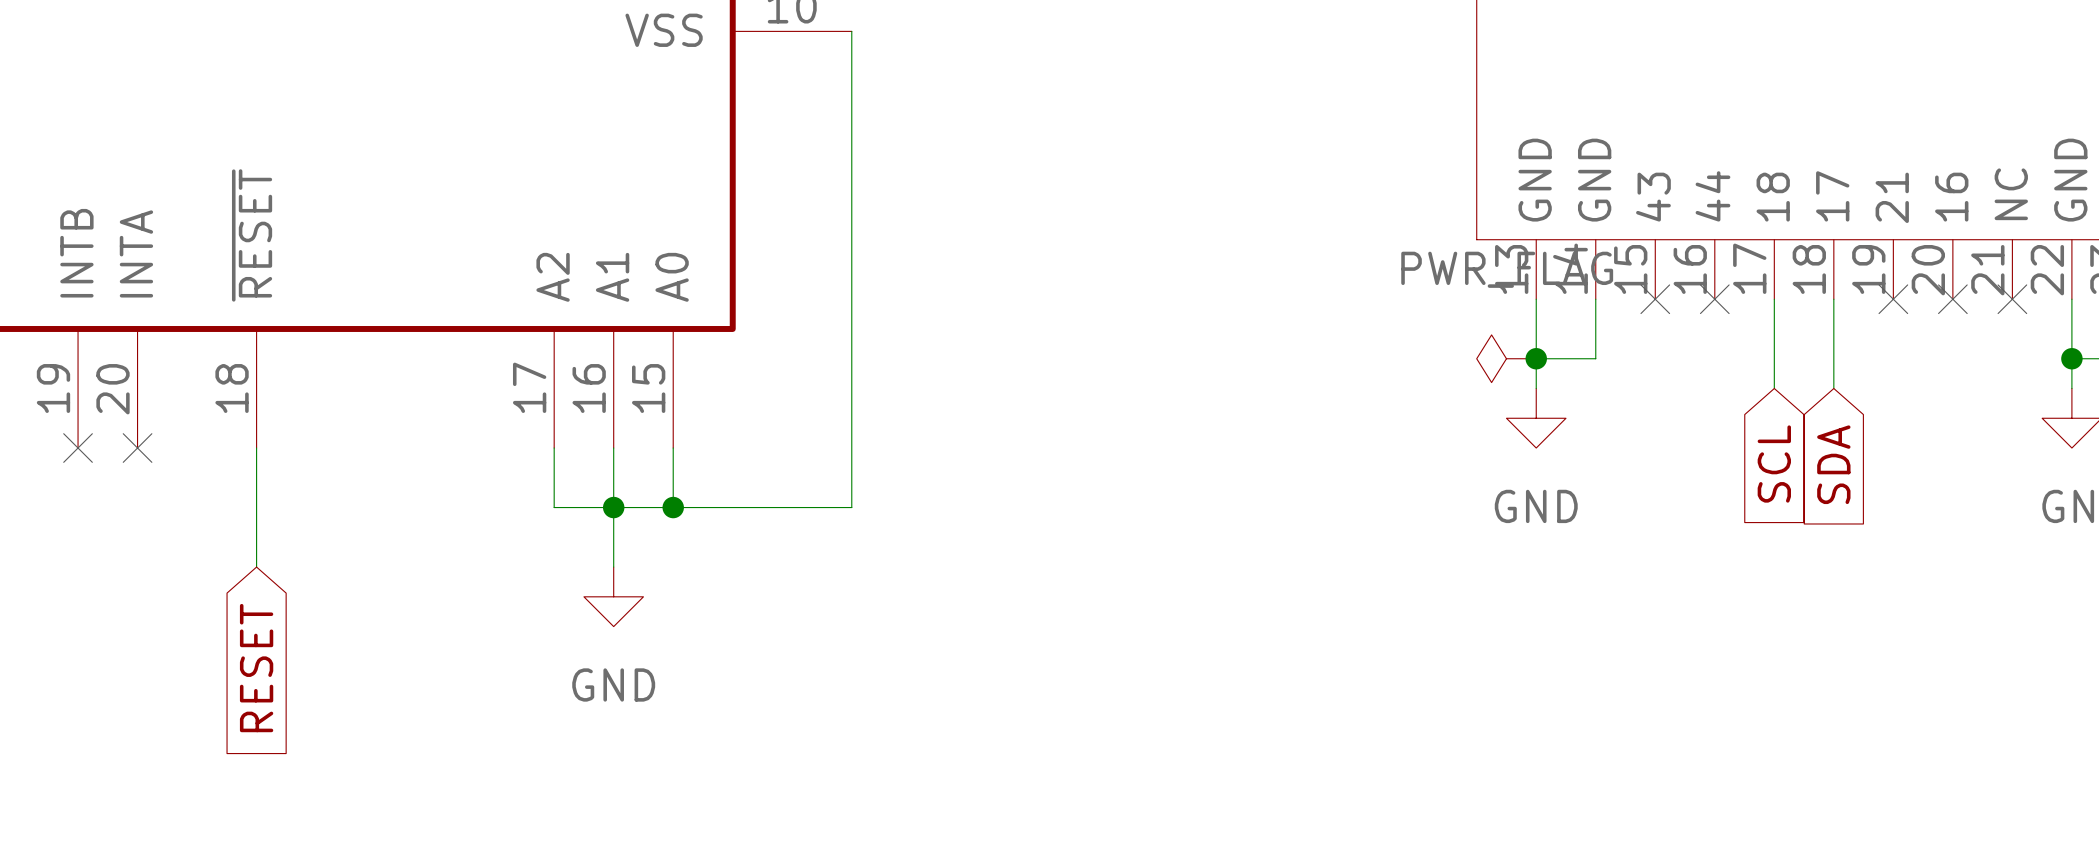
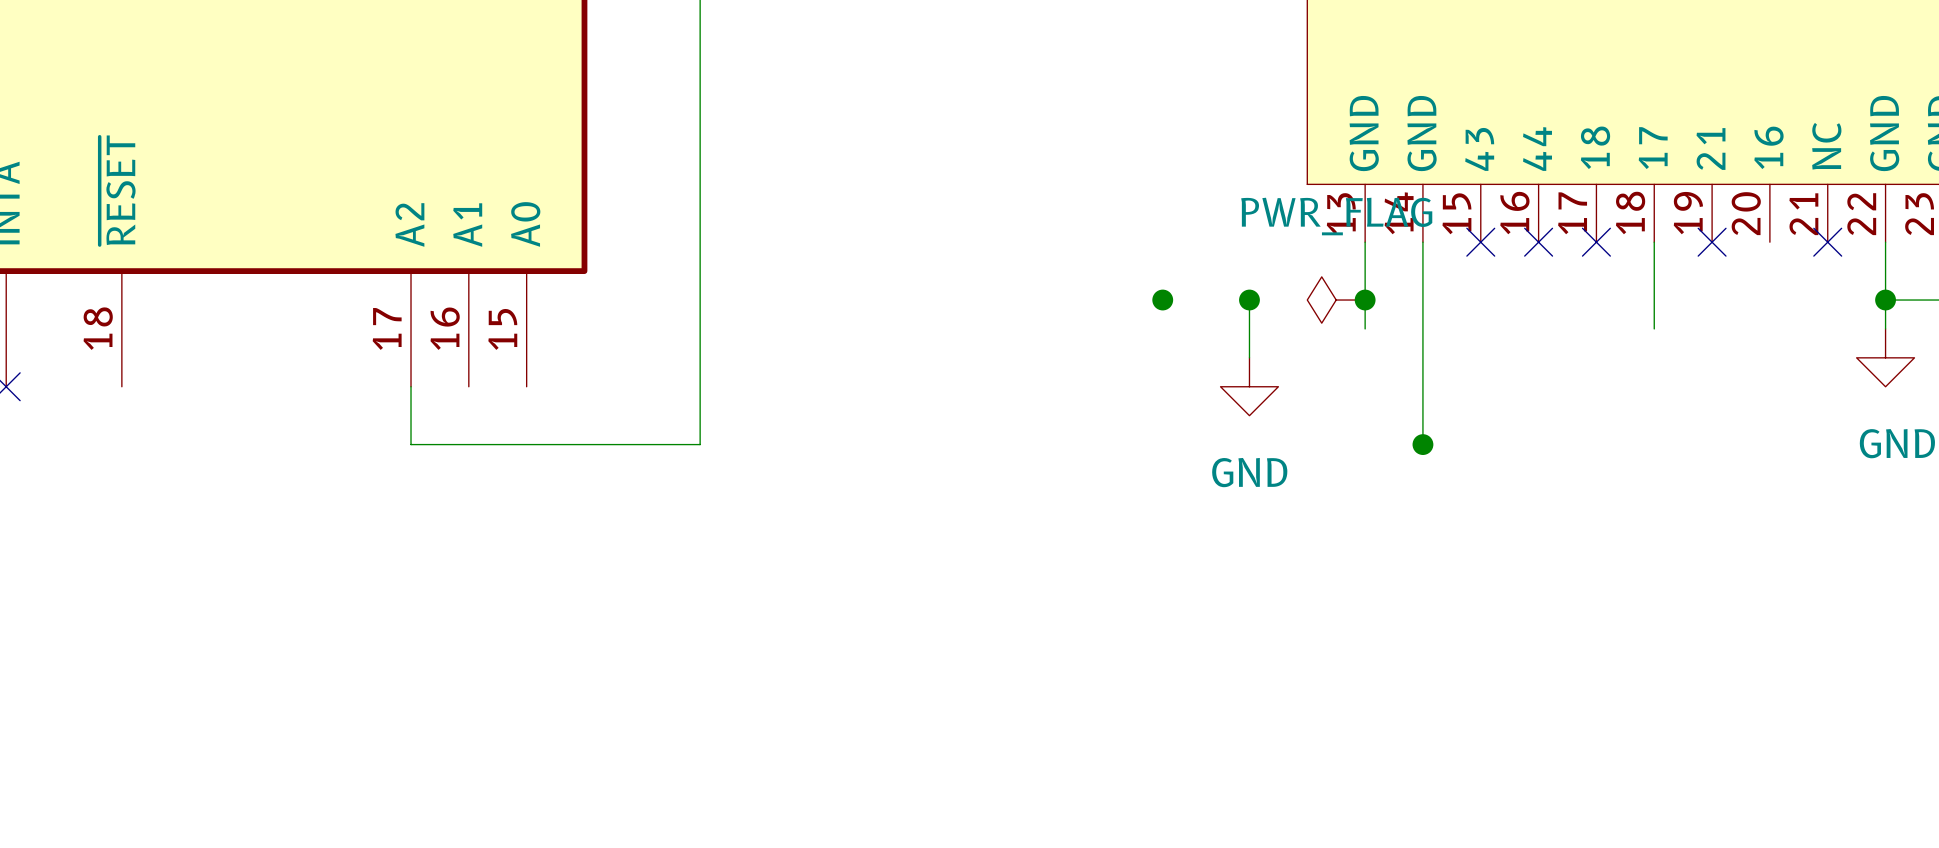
wire: (1774, 299) (1774, 388) -> none
no-connect mark: none -> (1596, 242)
no-connect mark: (1952, 299) -> none
junction: none -> (1162, 300)
wire: none -> (1249, 300) (1249, 357)
junction: none -> (1249, 300)
wire: (1536, 358) (1595, 358) -> (1422, 444) (1422, 300)
power symbol position: GND (1536, 418) -> GND (1249, 386)
wire: (256, 448) (256, 567) -> none
wire: (613, 448) (613, 567) -> none
wire: (673, 448) (673, 507) -> none
global label: SCL (1774, 464) -> none
global label: SDA (1833, 464) -> none
junction: (613, 507) -> none
junction: (673, 507) -> none
junction: none -> (1422, 444)
power symbol: GND (613, 596) -> none
global label: RESET (256, 668) -> none

